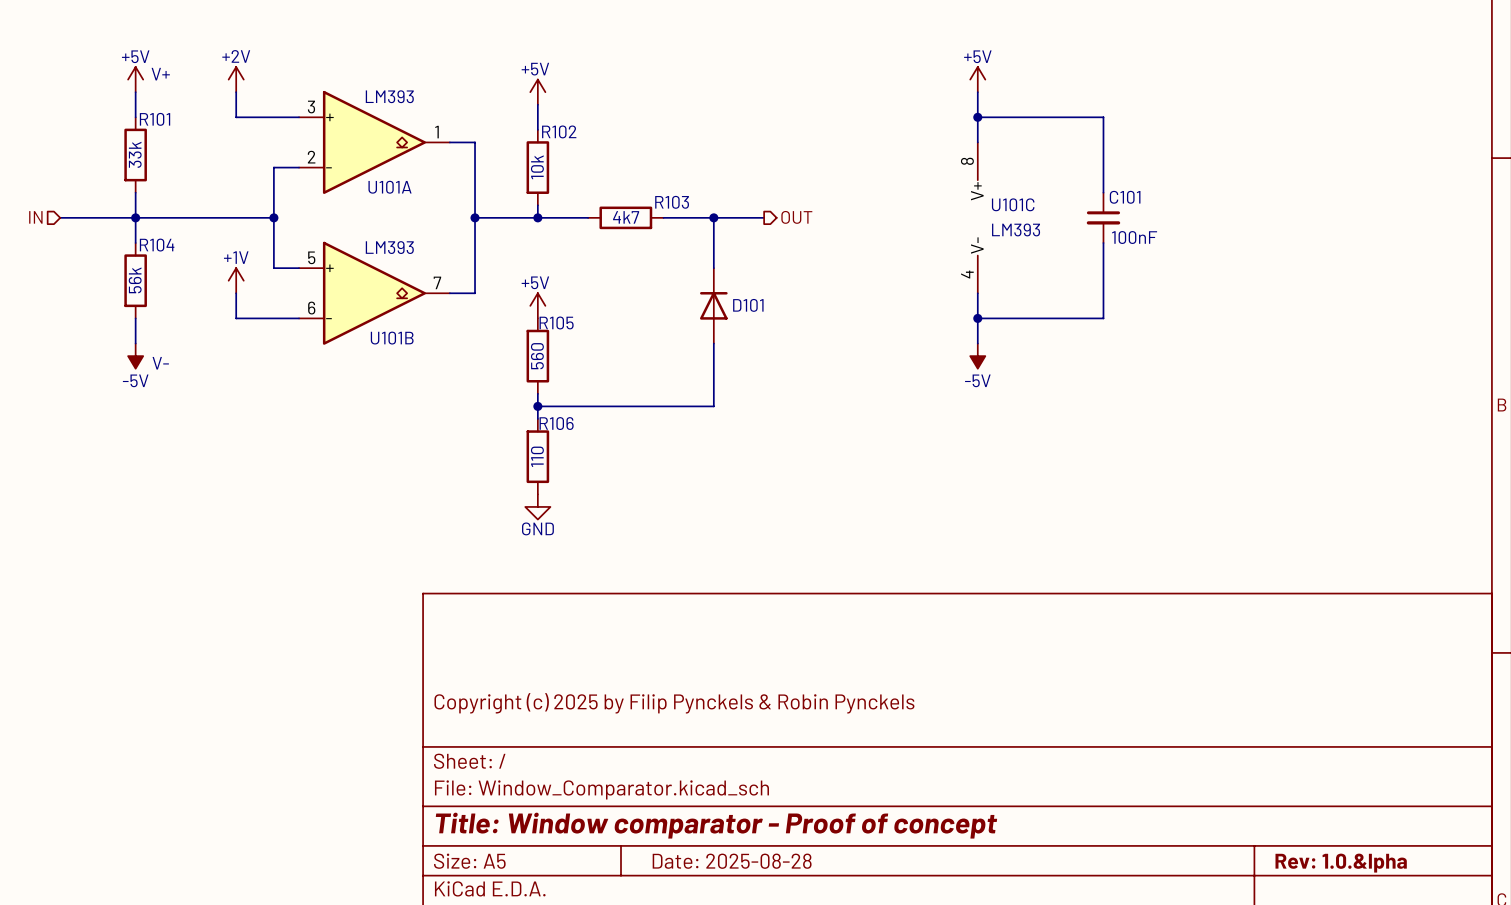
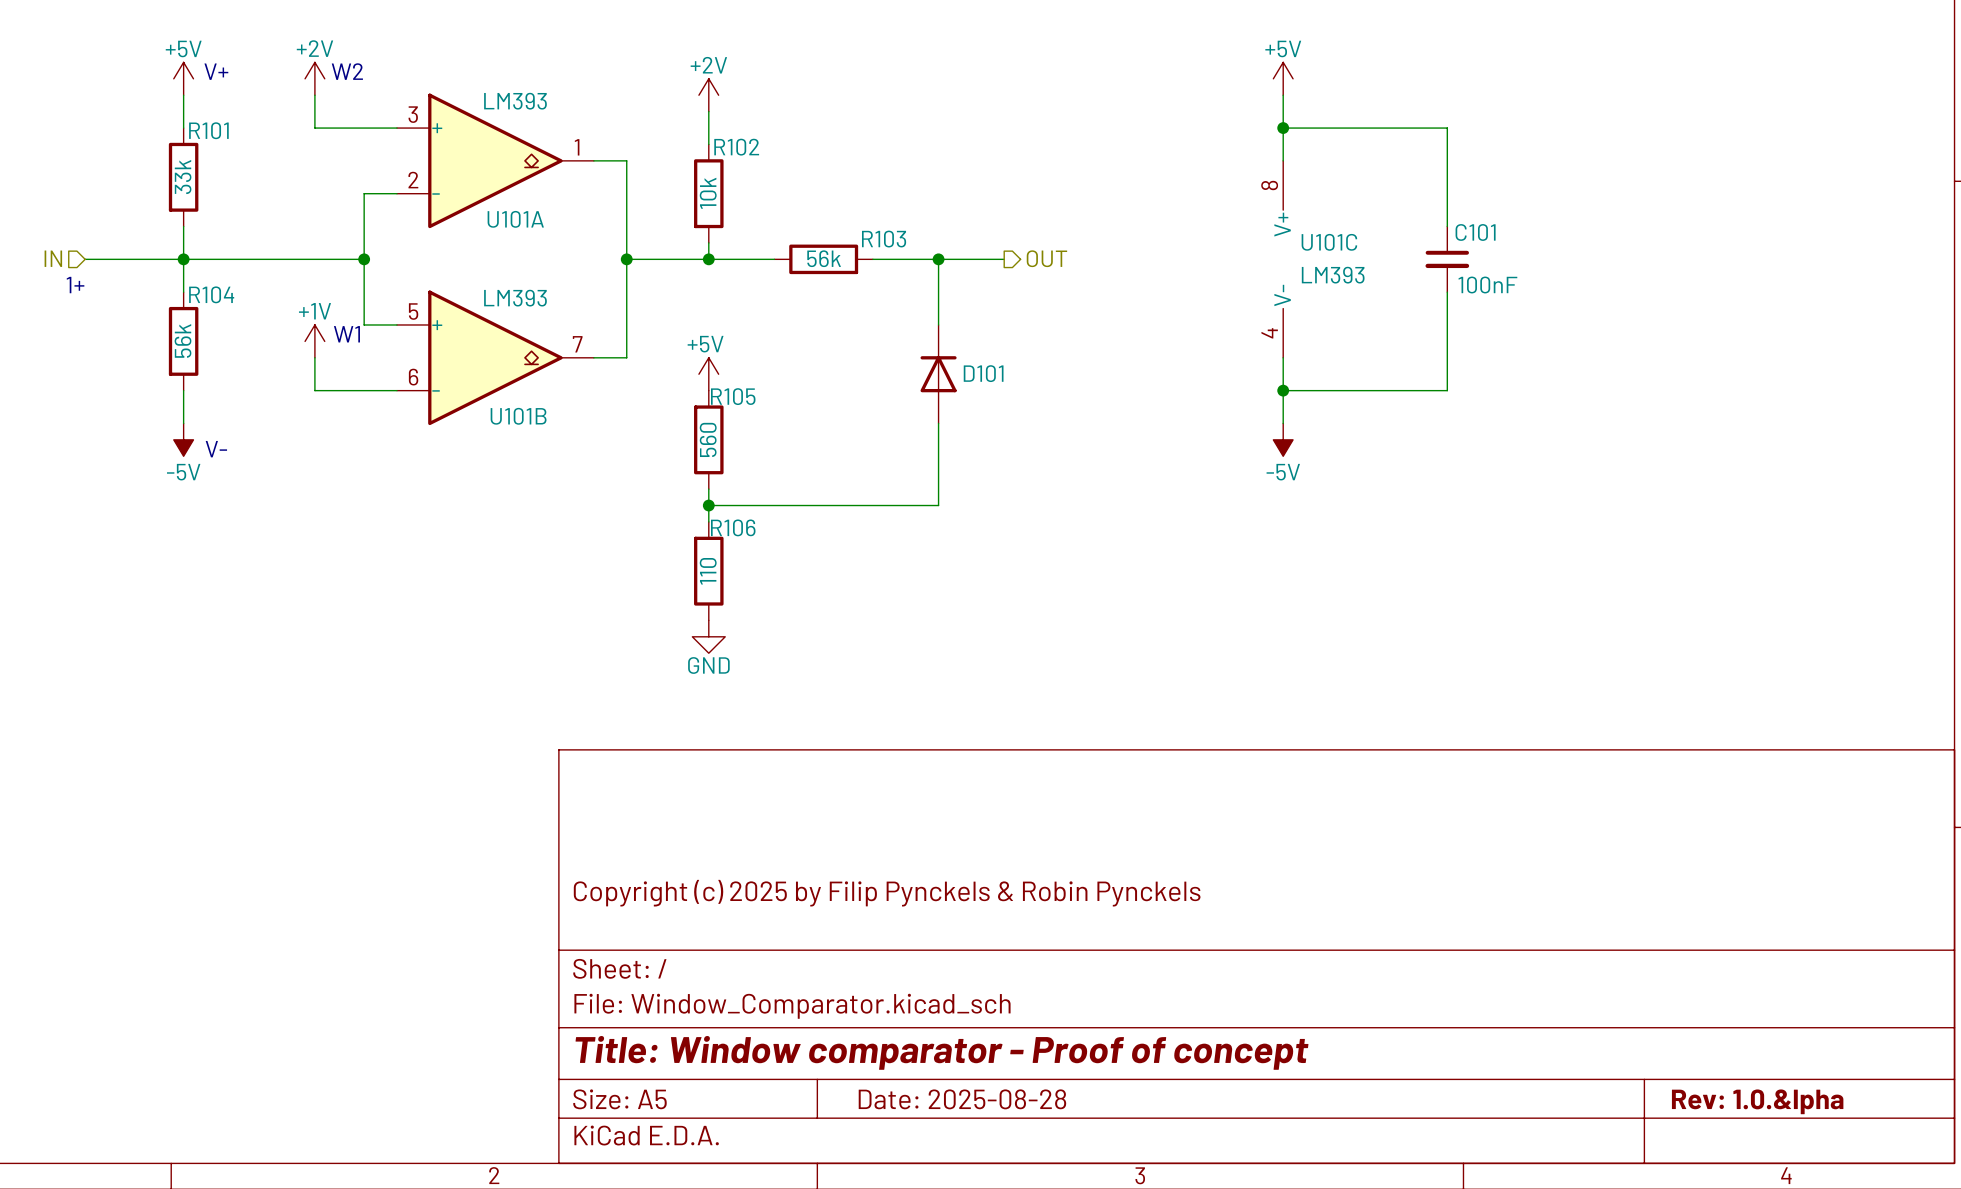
text: none -> W2 (347, 71)
power symbol: +5V (537, 92) -> +2V (708, 95)
R103 value: 4k7 (626, 217) -> 56k (824, 258)
text: none -> 1+ (75, 285)
text: none -> W1 (346, 334)

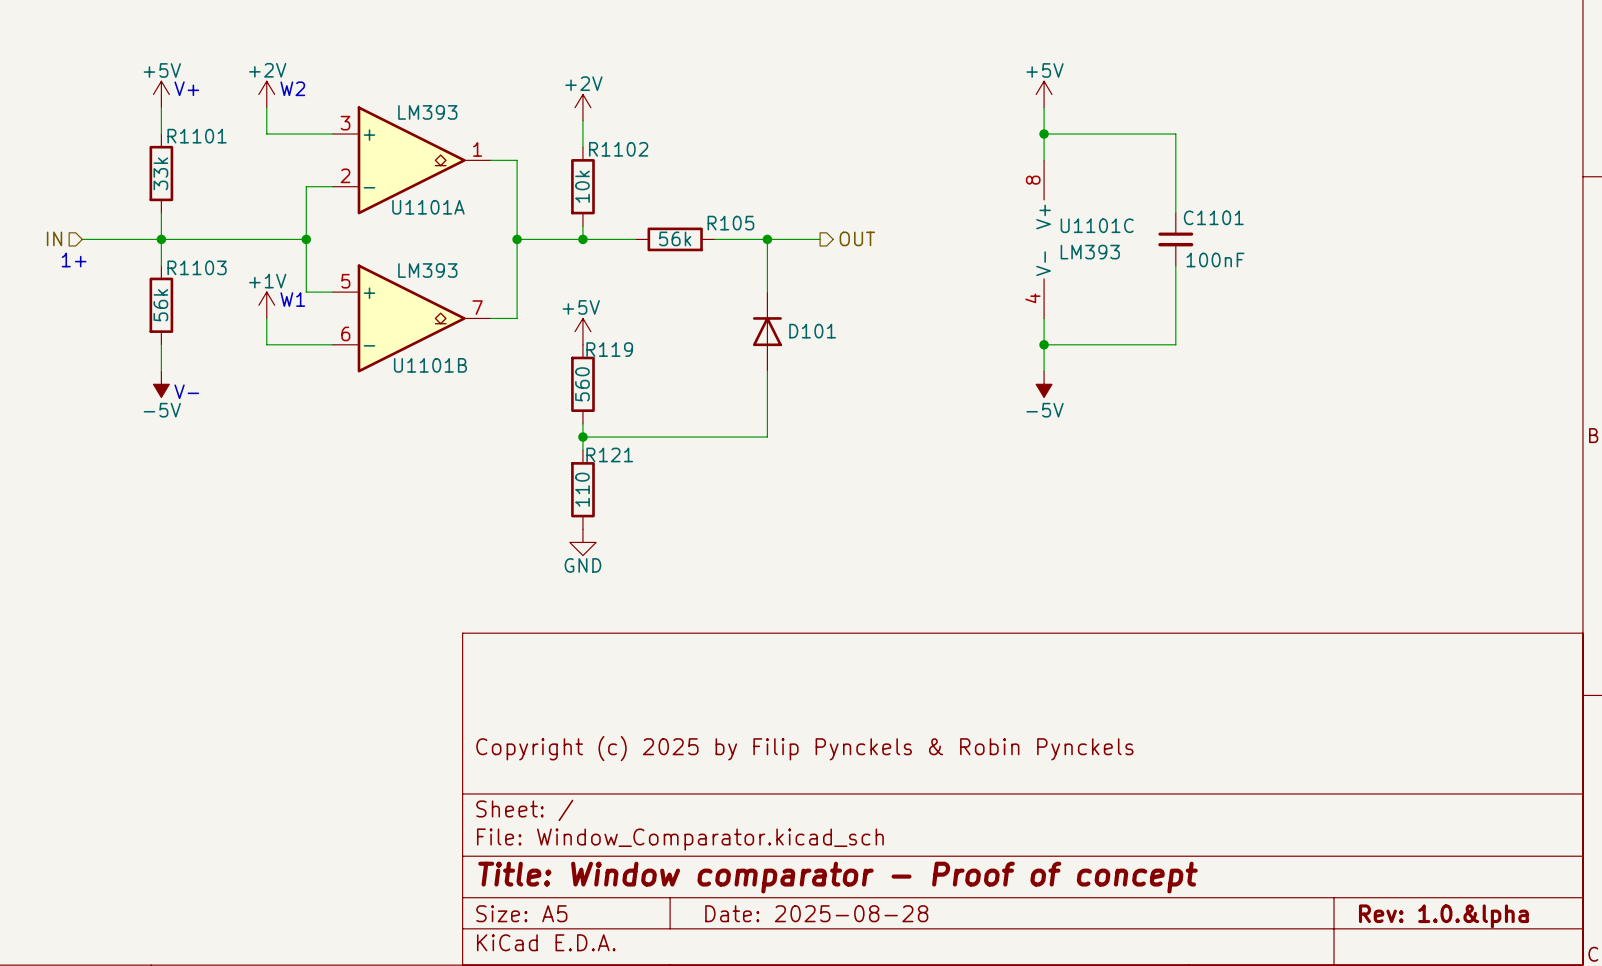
R101 name: R101 (208, 130) -> R1101 (197, 136)
R102 name: R102 (736, 147) -> R1102 (618, 149)
U101A name: U101A (515, 219) -> U1101A (428, 207)
C101 name: C101 (1475, 232) -> C1101 (1213, 217)
R103 name: R103 (884, 239) -> R105 (730, 223)
U101C name: U101C (1329, 242) -> U1101C (1097, 225)
R104 name: R104 (211, 294) -> R1103 (197, 267)
R105 name: R105 (733, 396) -> R119 (609, 349)
U101B name: U101B (518, 416) -> U1101B (430, 365)
R106 name: R106 (733, 527) -> R121 (609, 454)

